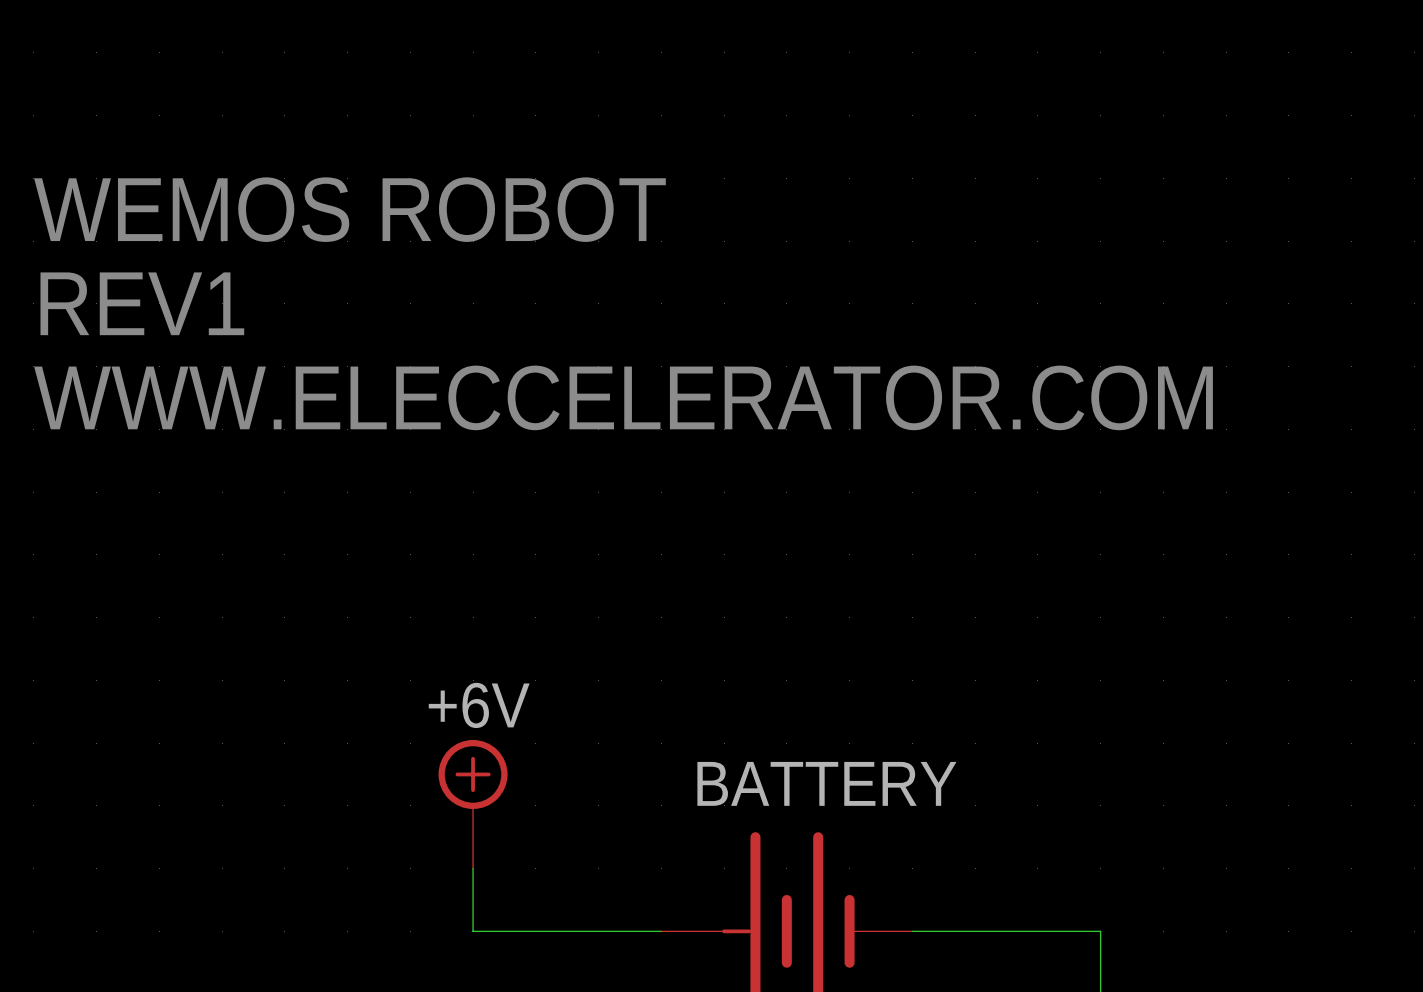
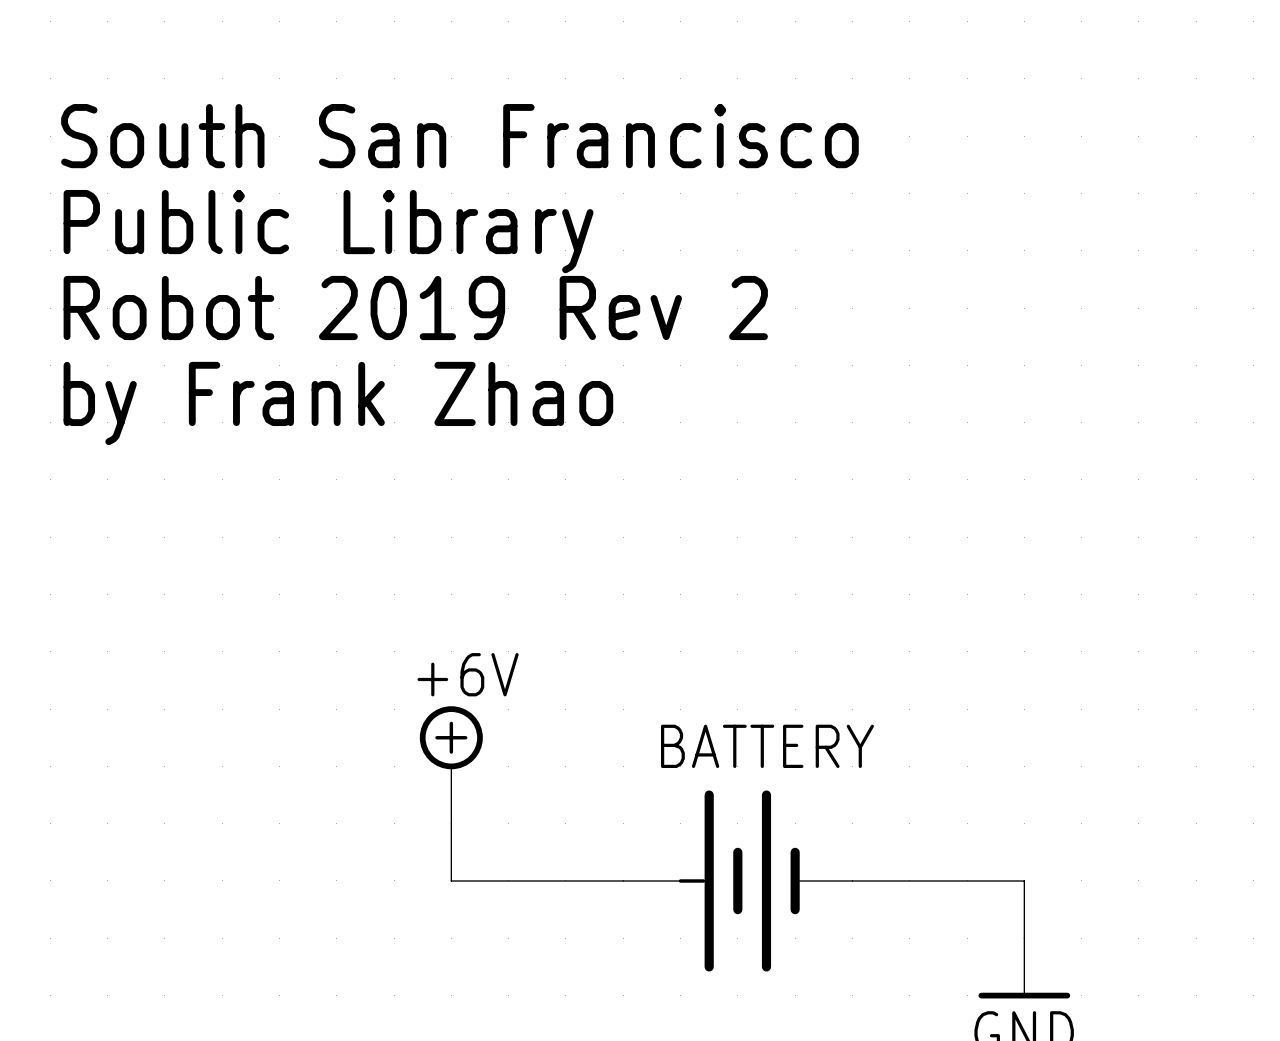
part: none -> (459, 274)
part: (623, 303) -> none

